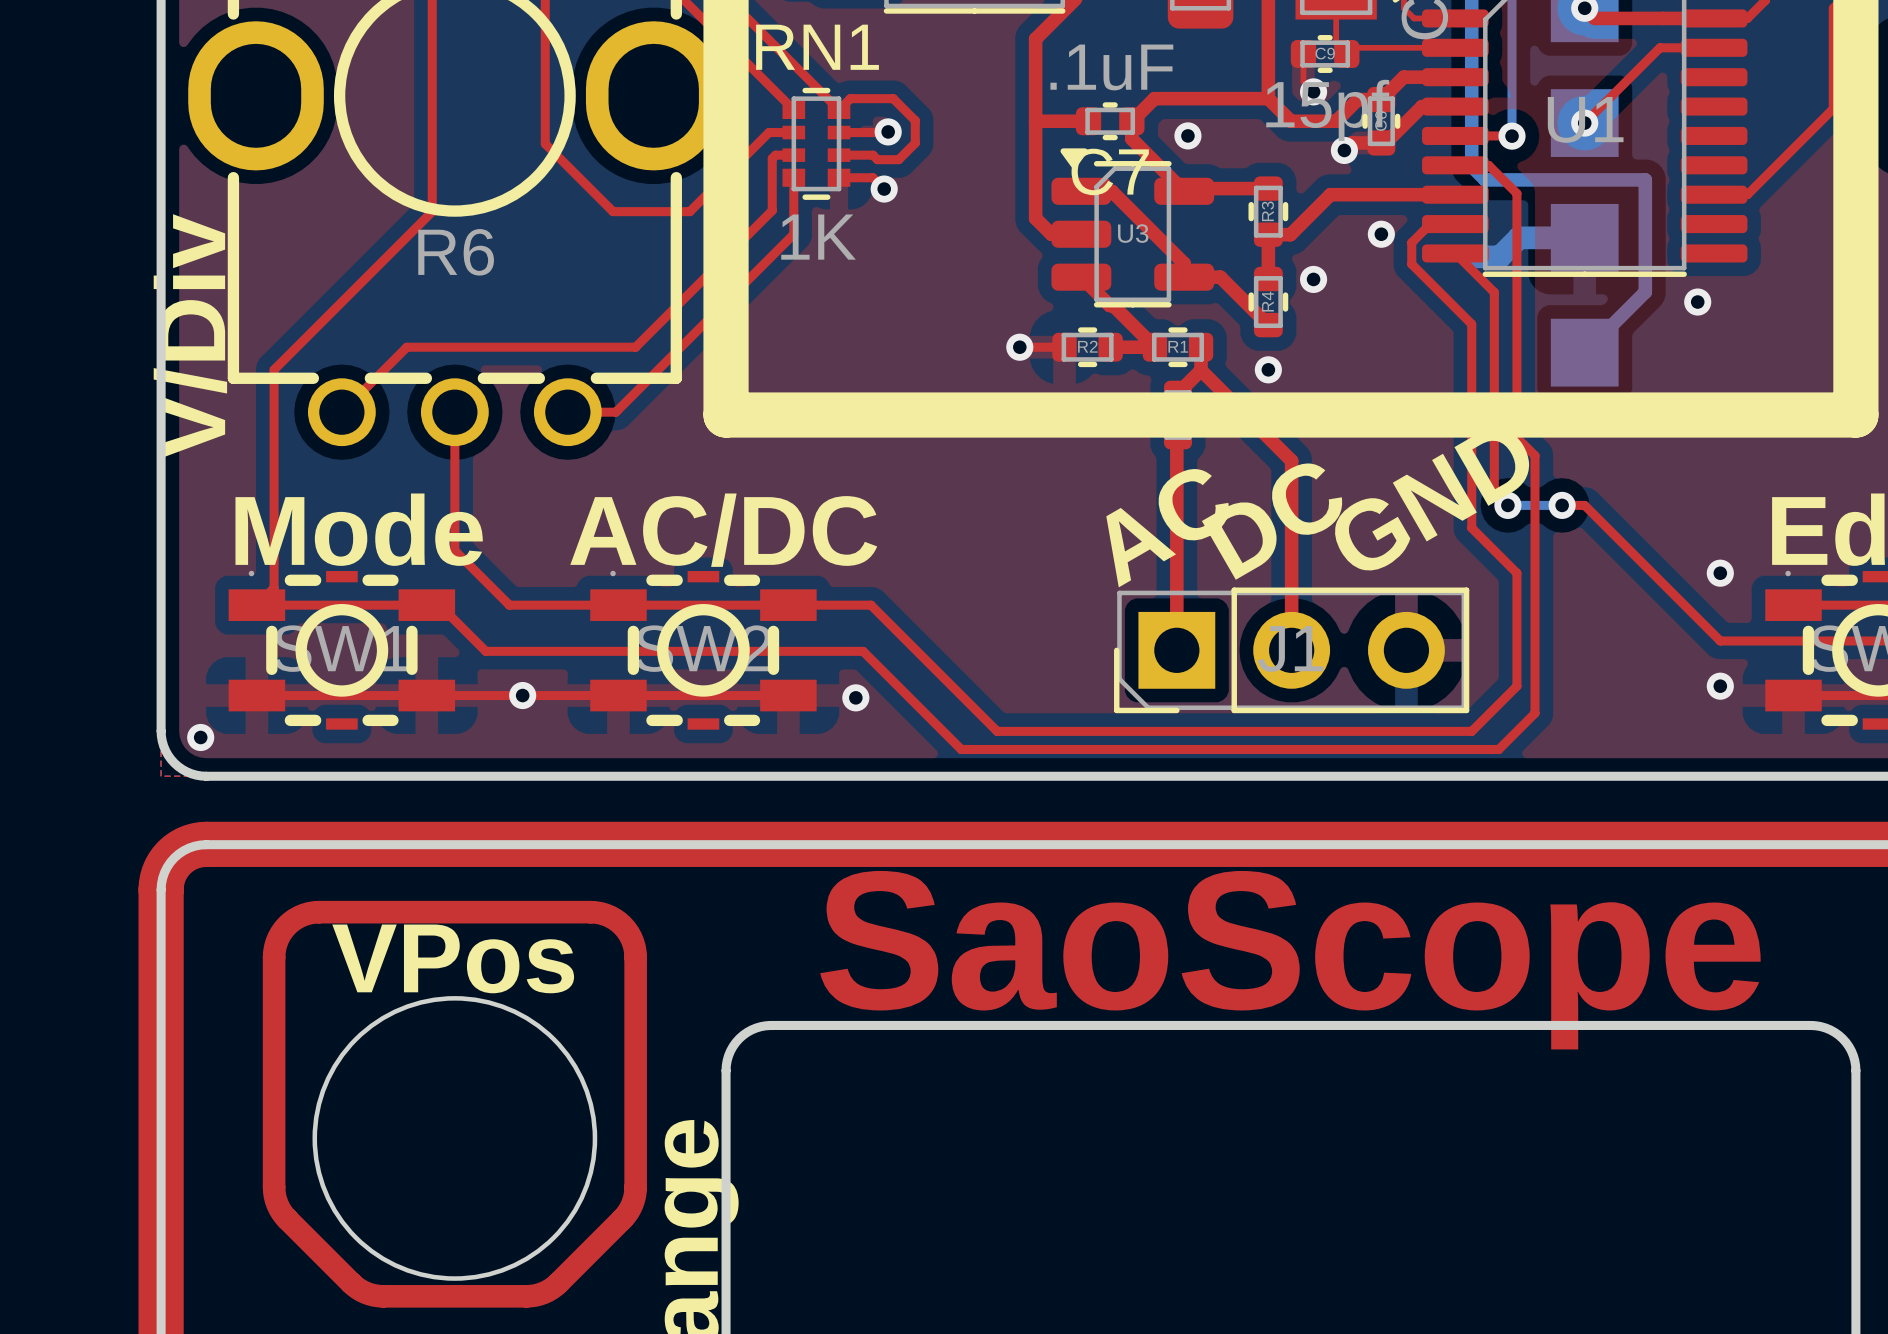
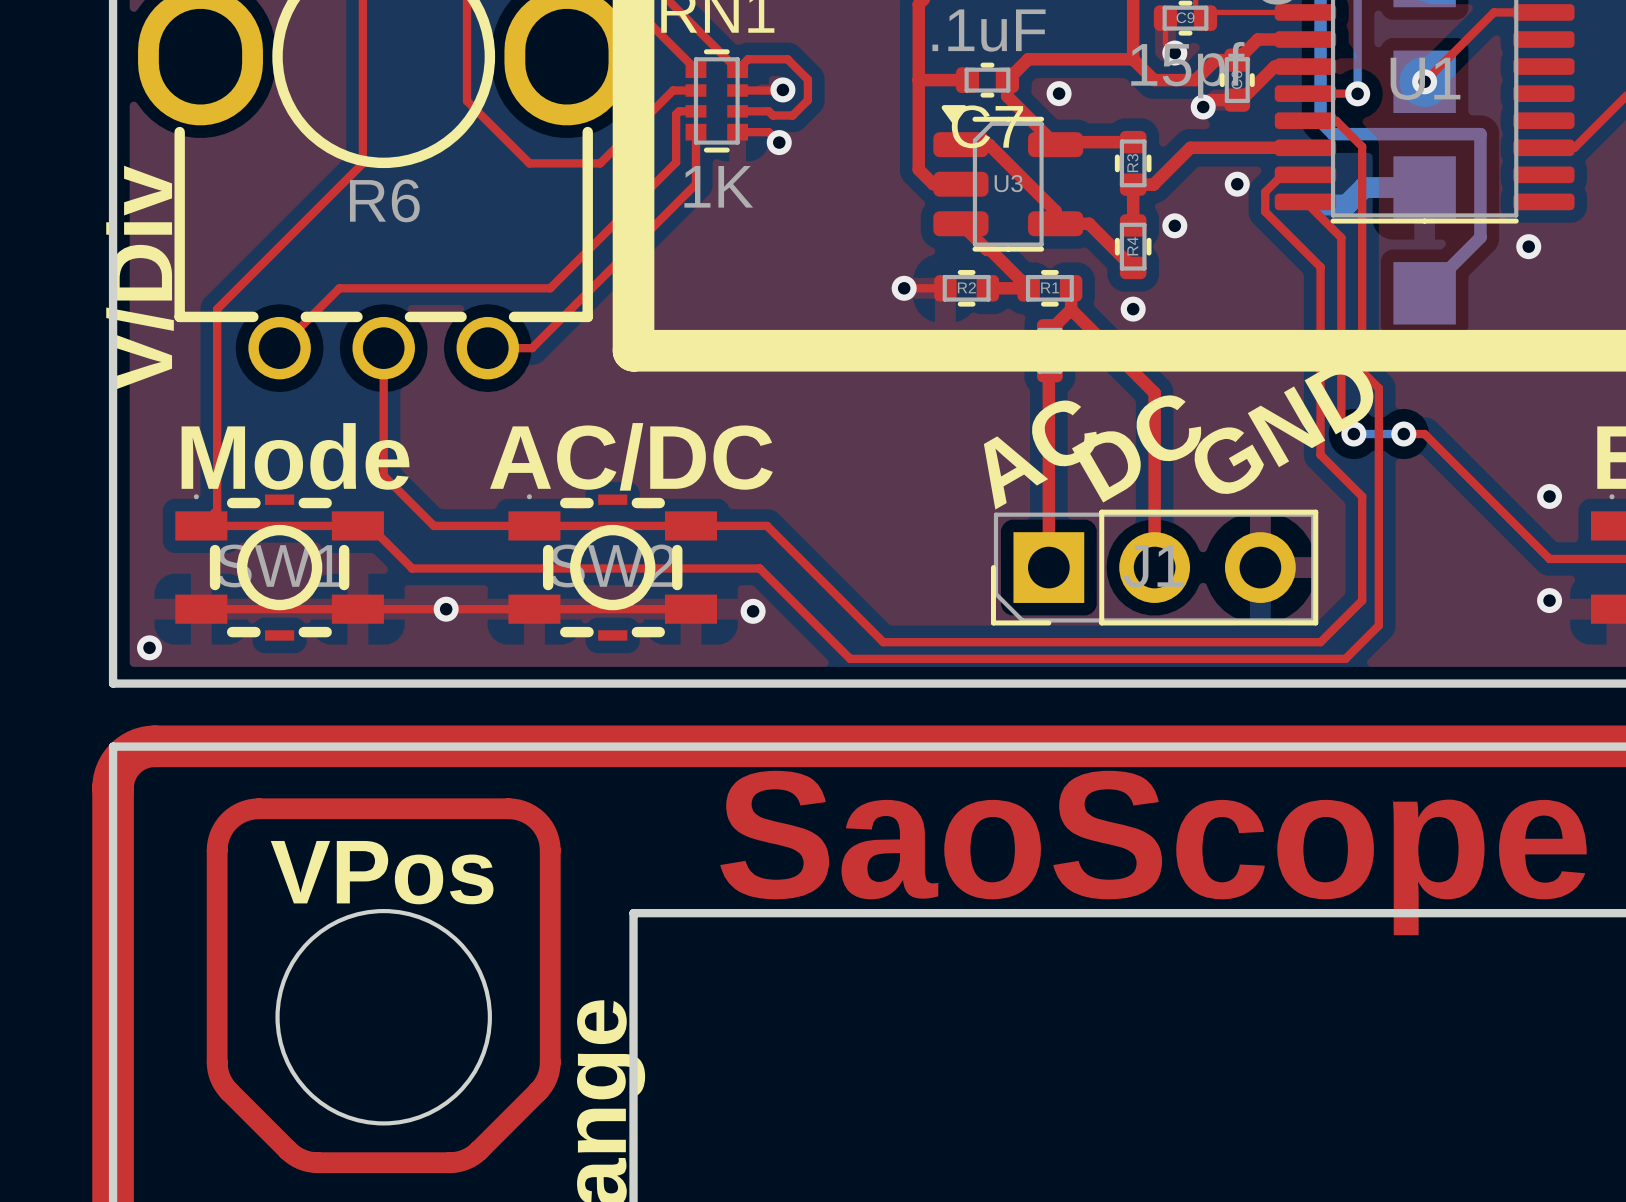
board edge: (161, 731) (163, 746) (174, 763) (191, 773) (206, 776) -> (113, 641) (113, 683) (154, 683)
board edge: (206, 844) (189, 848) (174, 857) (164, 872) (161, 889) -> (154, 746) (113, 746) (113, 788)
text position: VPos (453, 958) -> VPos (382, 872)
round board edge size: [312, 996, 598, 1281] -> [275, 908, 492, 1126]
board edge: (771, 1025) (751, 1029) (739, 1038) (728, 1055) (726, 1070) -> (675, 913) (633, 913) (633, 954)

